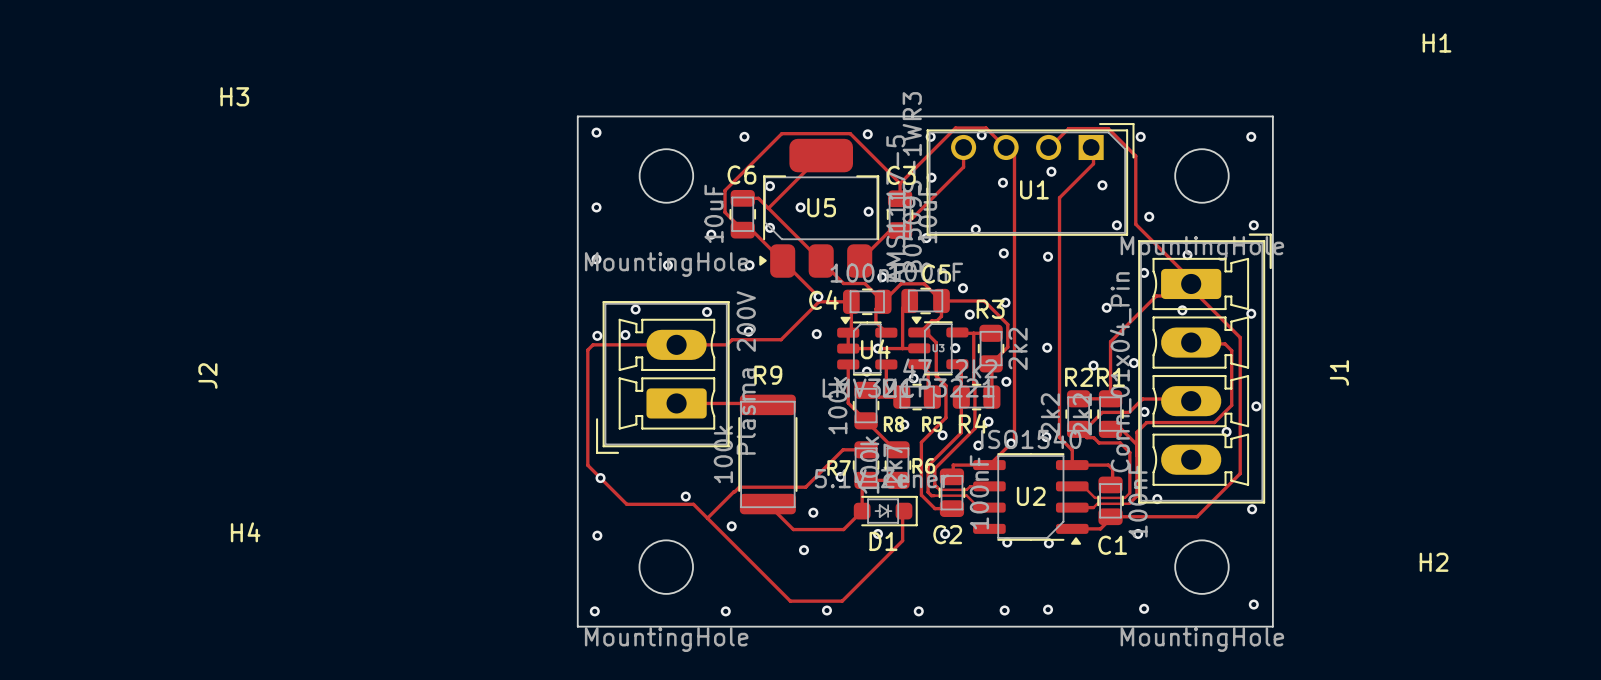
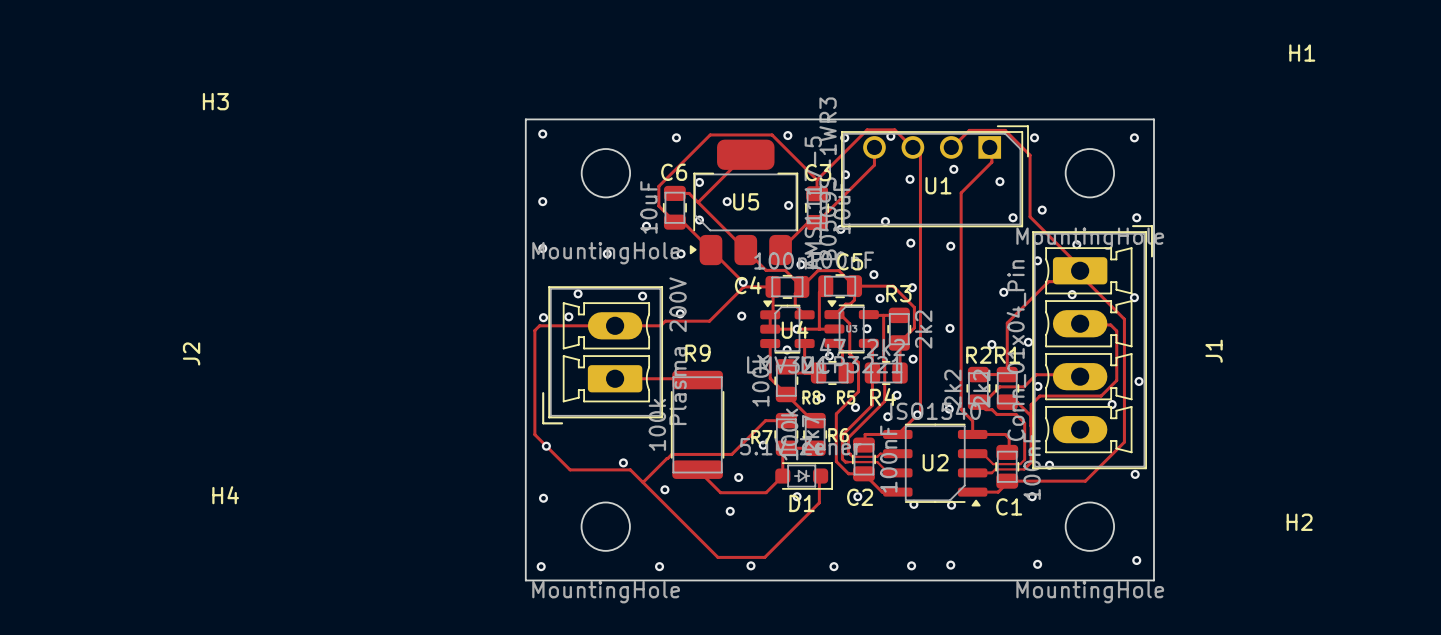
track: none -> (863, 473) (882, 492) (897, 492)

